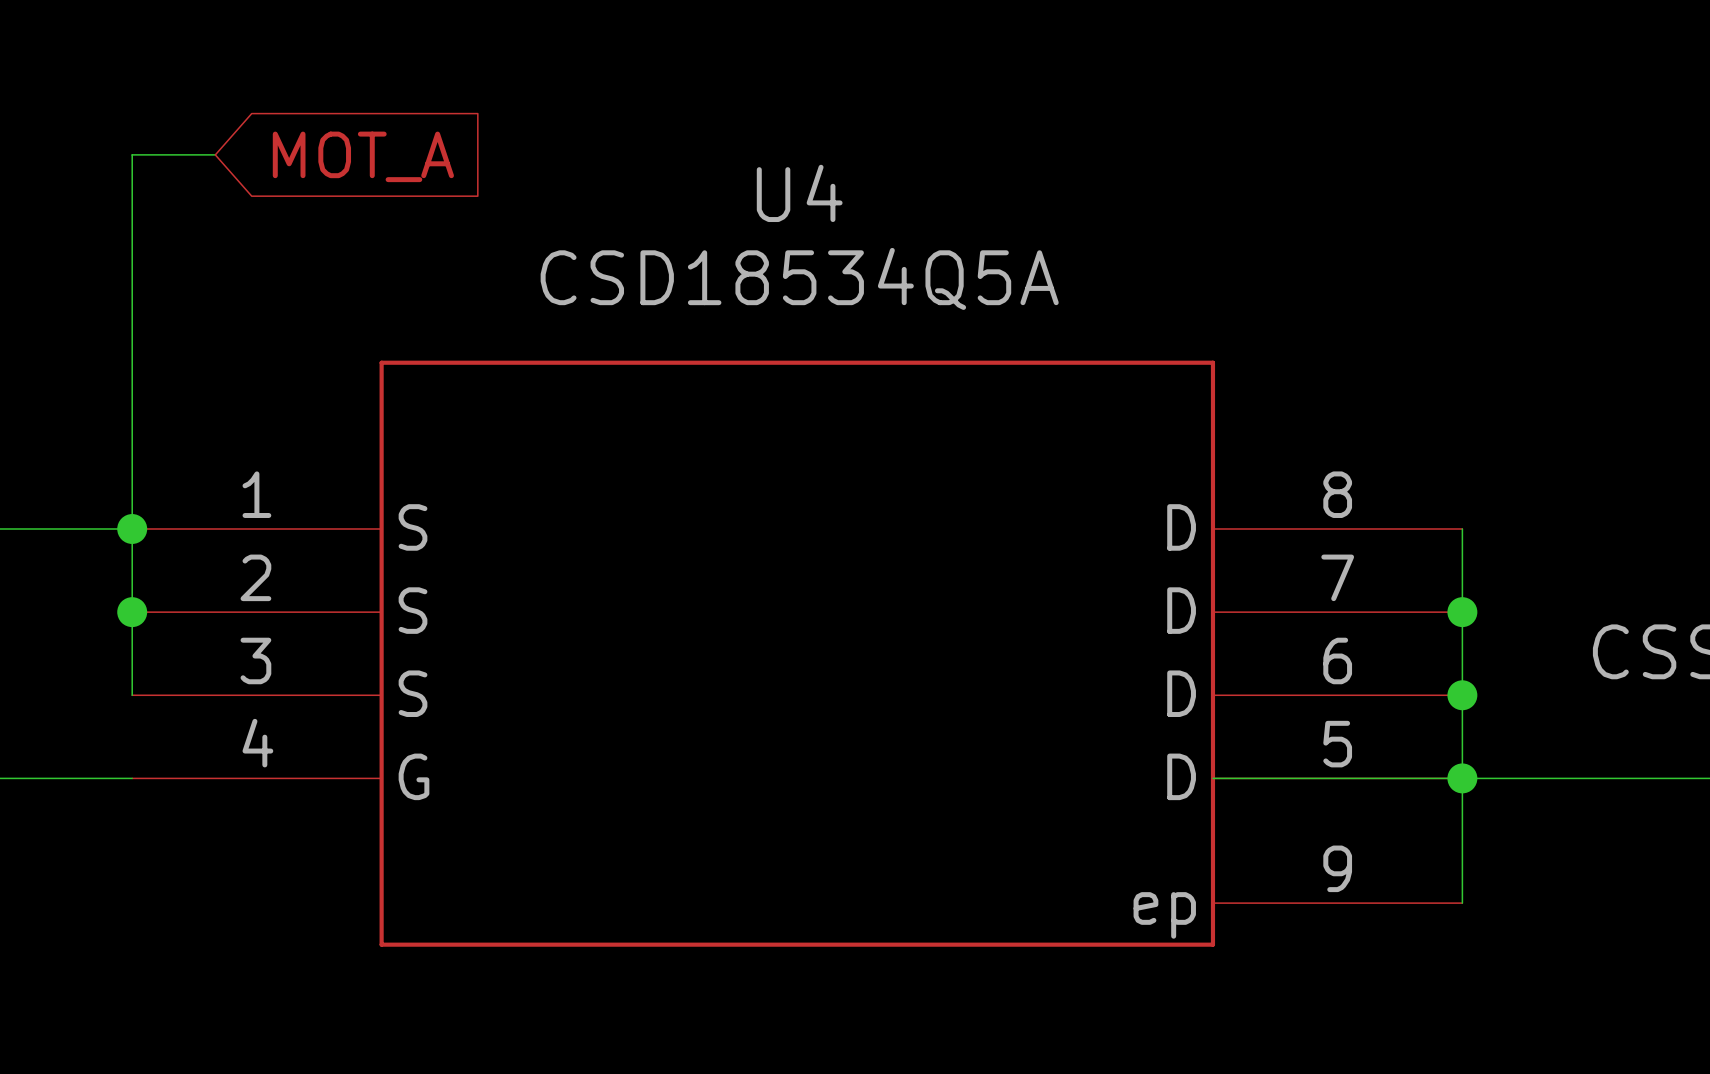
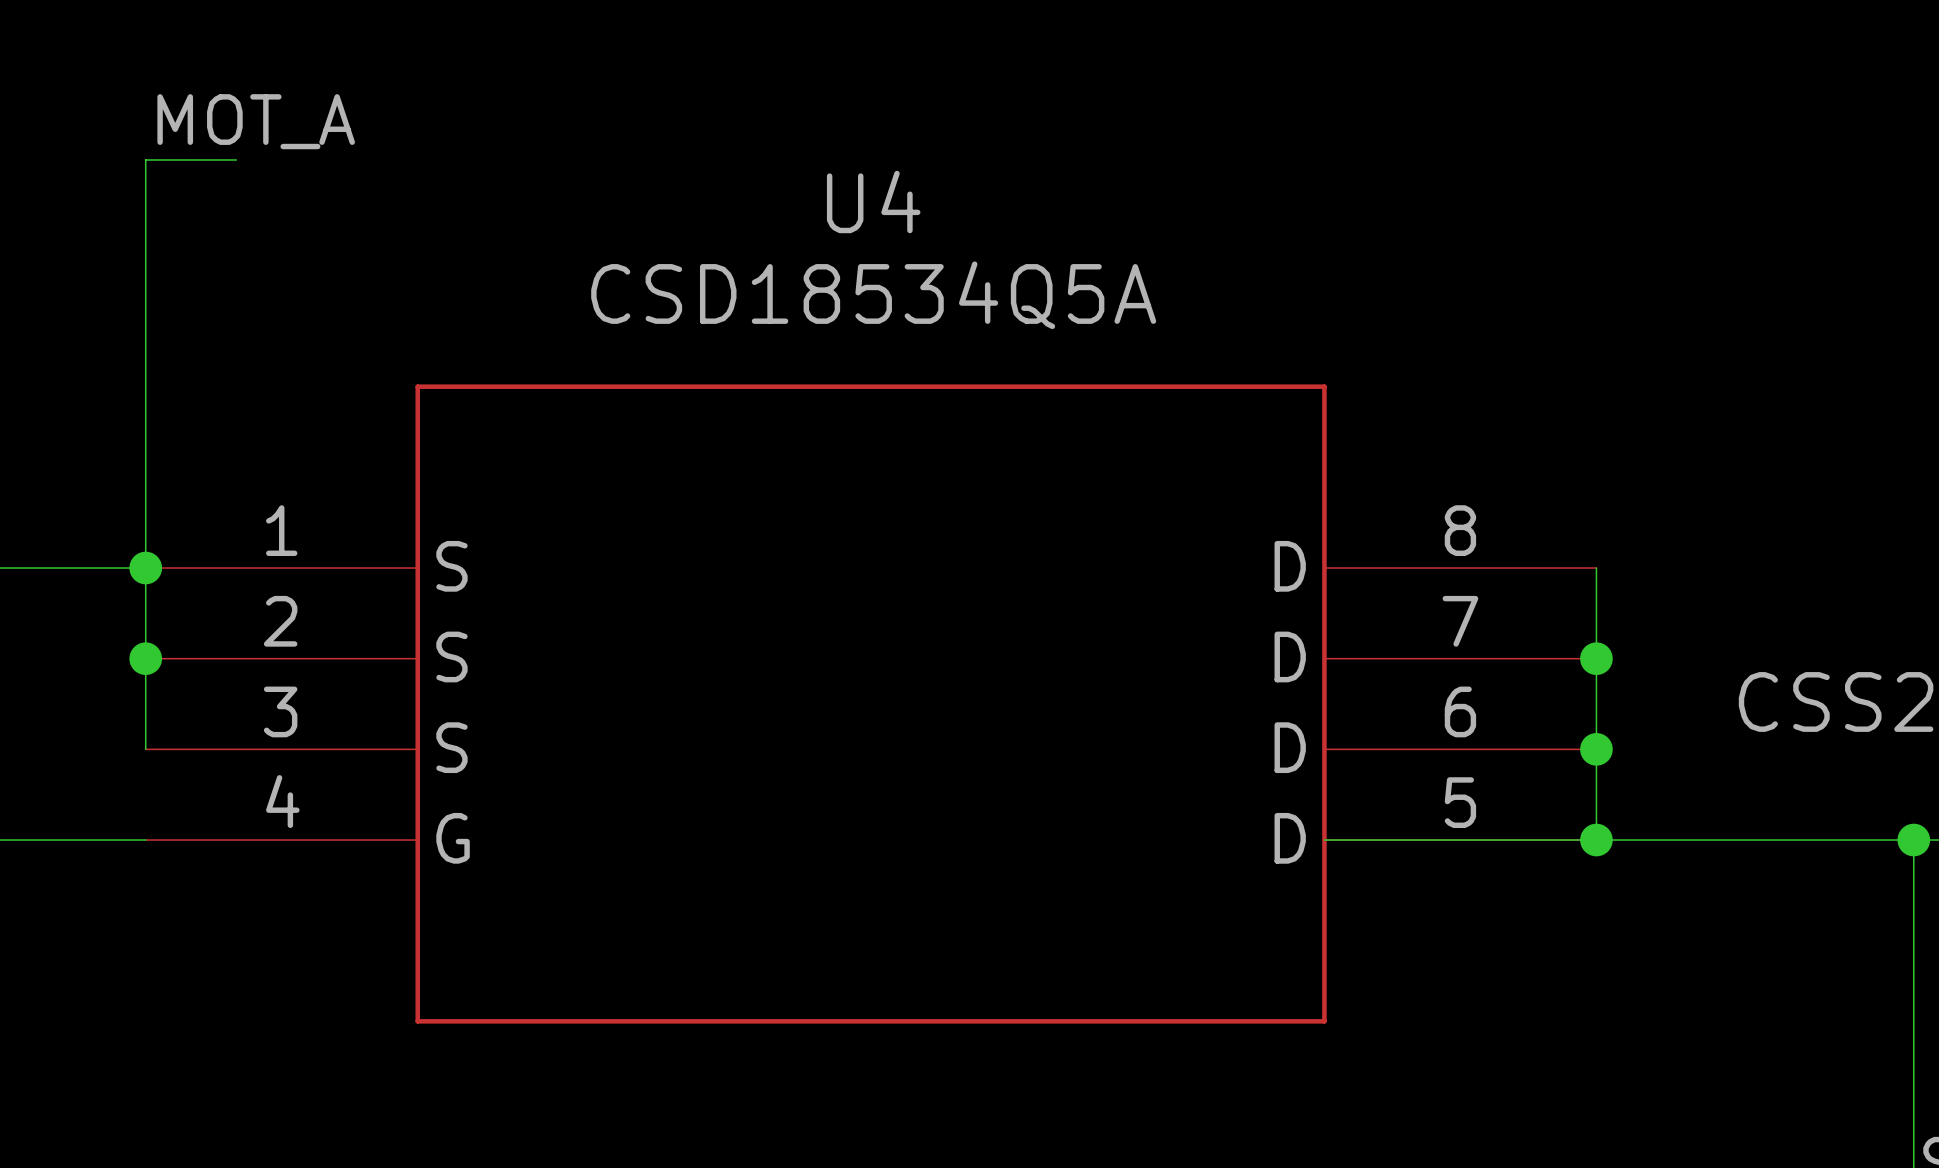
label: none -> MOT_A (256, 121)
global label: MOT_A (363, 156) -> none
U4 symbol: [132, 360, 1463, 947] -> [145, 384, 1597, 1024]
wire: (1462, 778) (1462, 903) -> none

